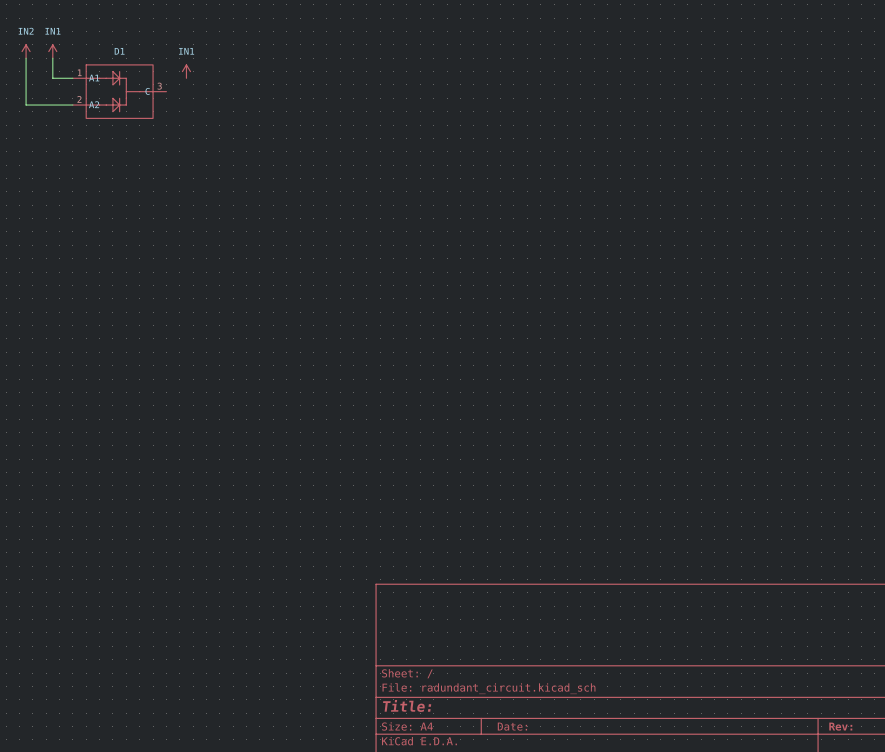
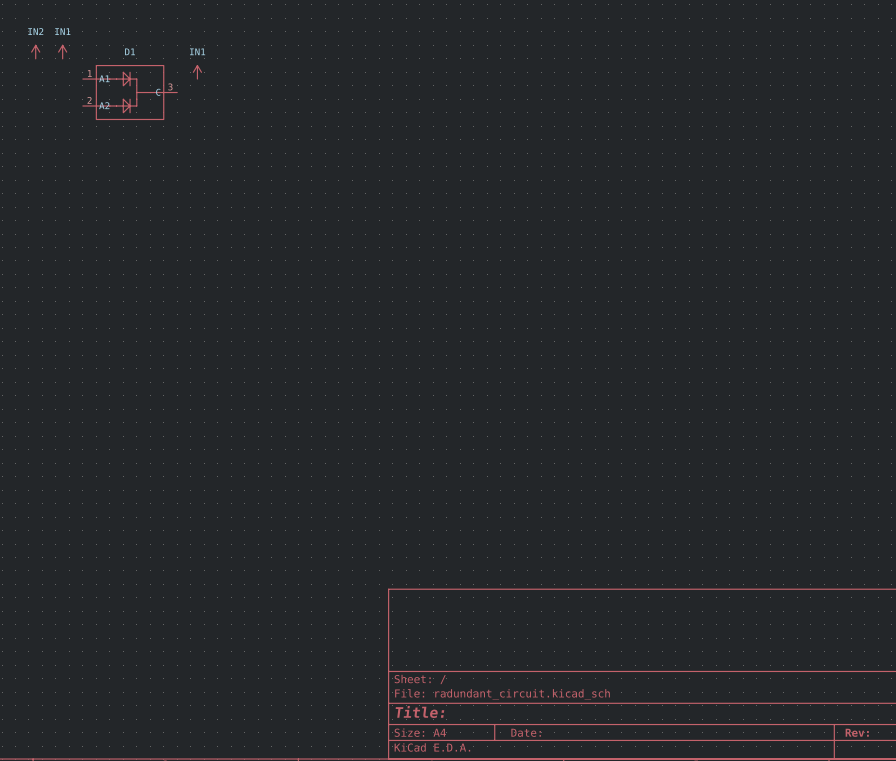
wire: (26, 58) (26, 105) (72, 105) -> none
wire: (52, 58) (52, 78) (72, 78) -> none

